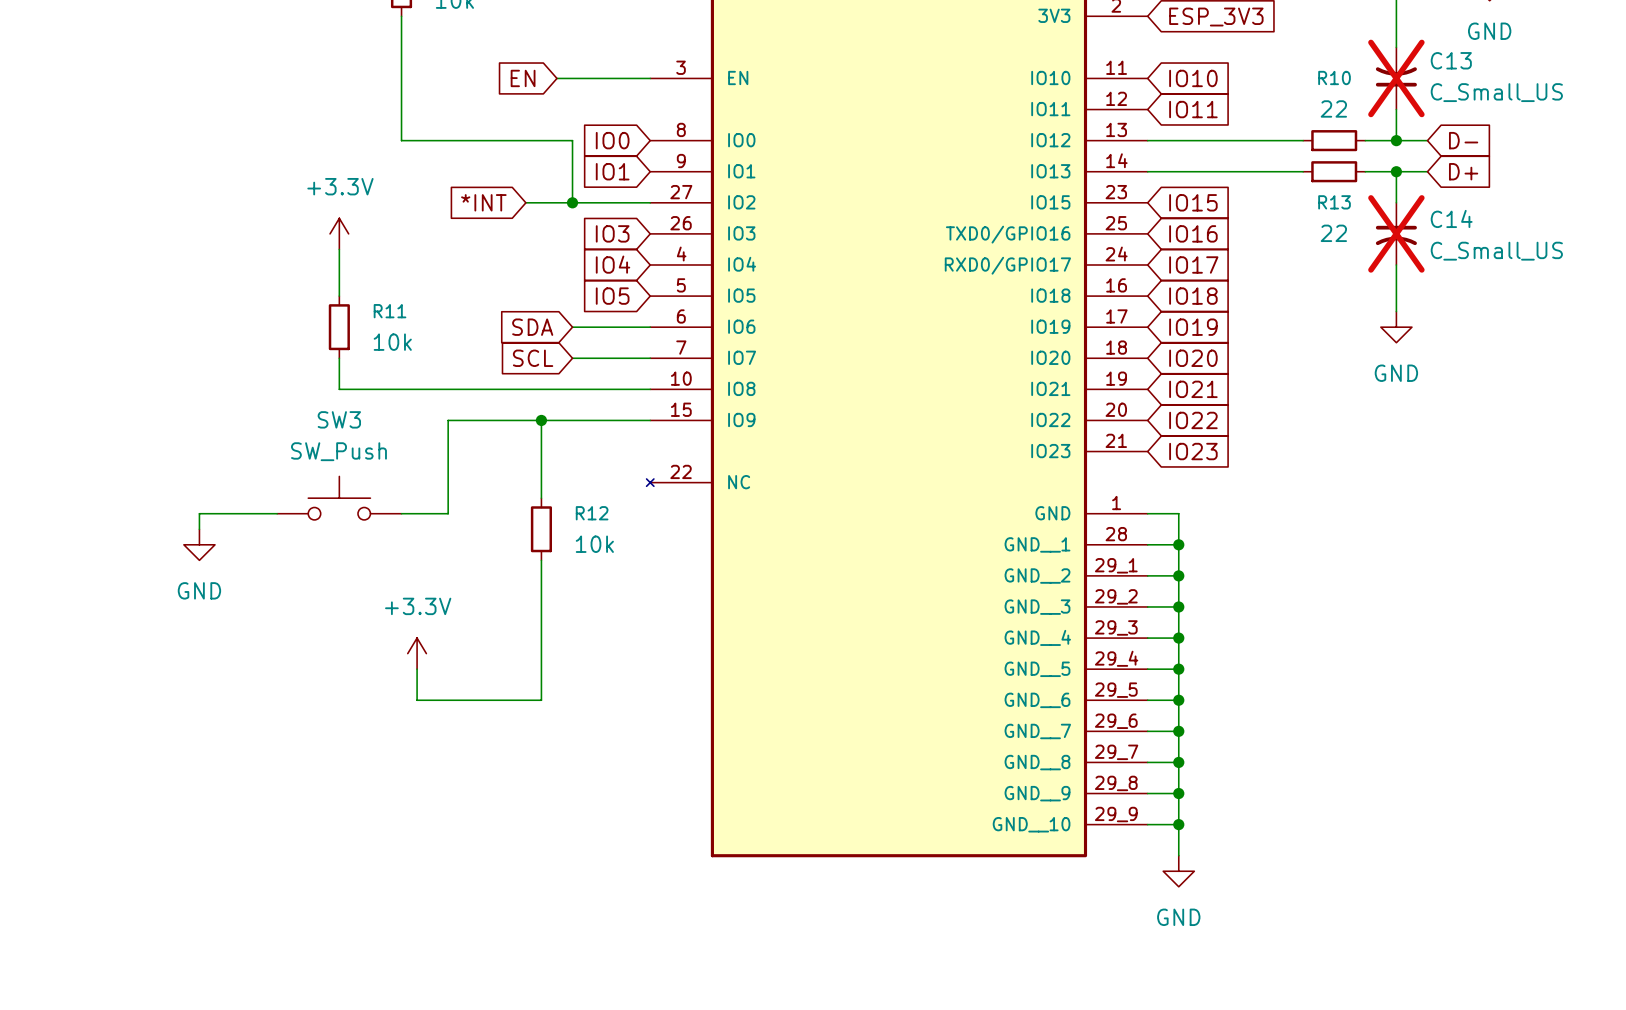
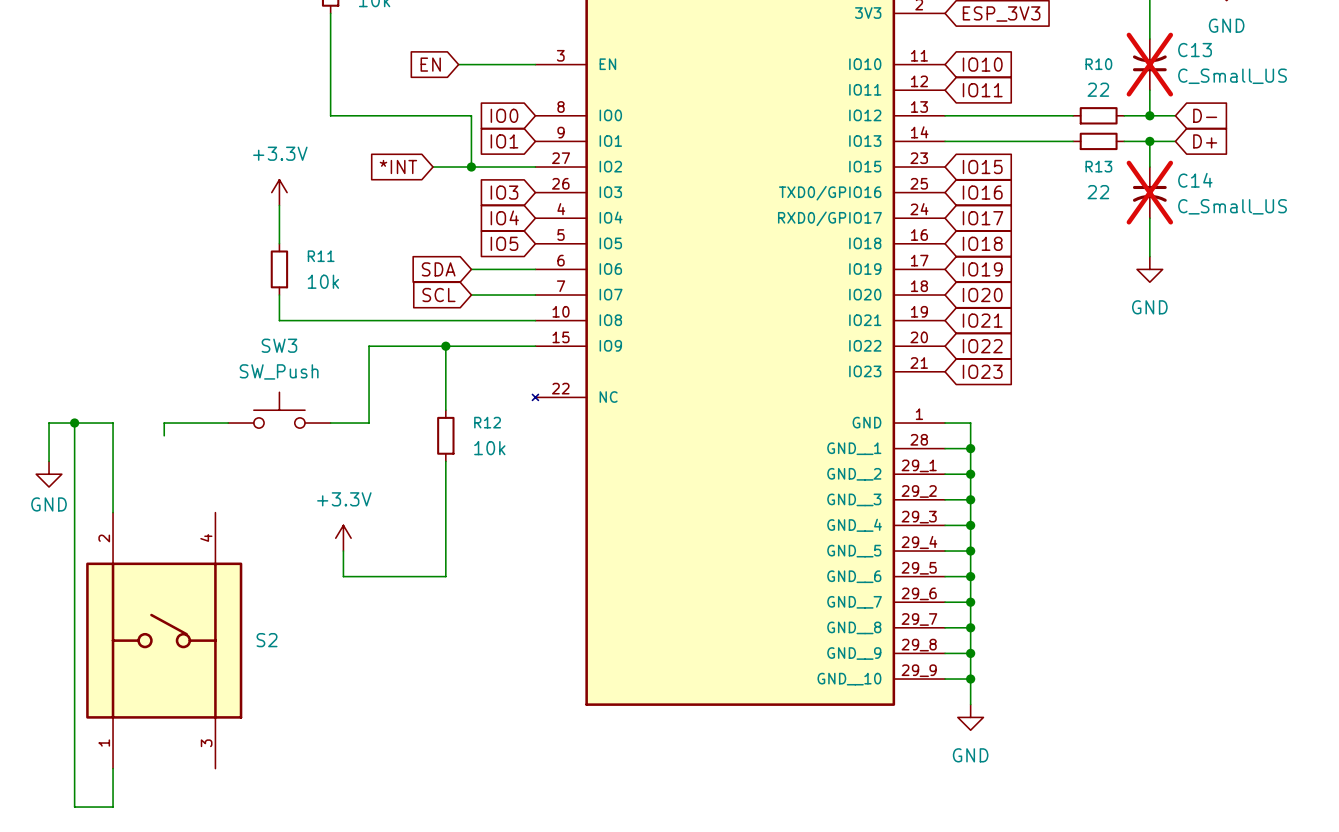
wire: none -> (74, 423) (74, 807) (113, 807) (113, 768)
junction: none -> (74, 423)
power symbol position: GND (199, 544) -> GND (49, 474)
wire: none -> (49, 461) (49, 423) (113, 423) (113, 512)
power symbol text position: GND (199, 590) -> GND (49, 504)
S2: none -> (164, 640)

